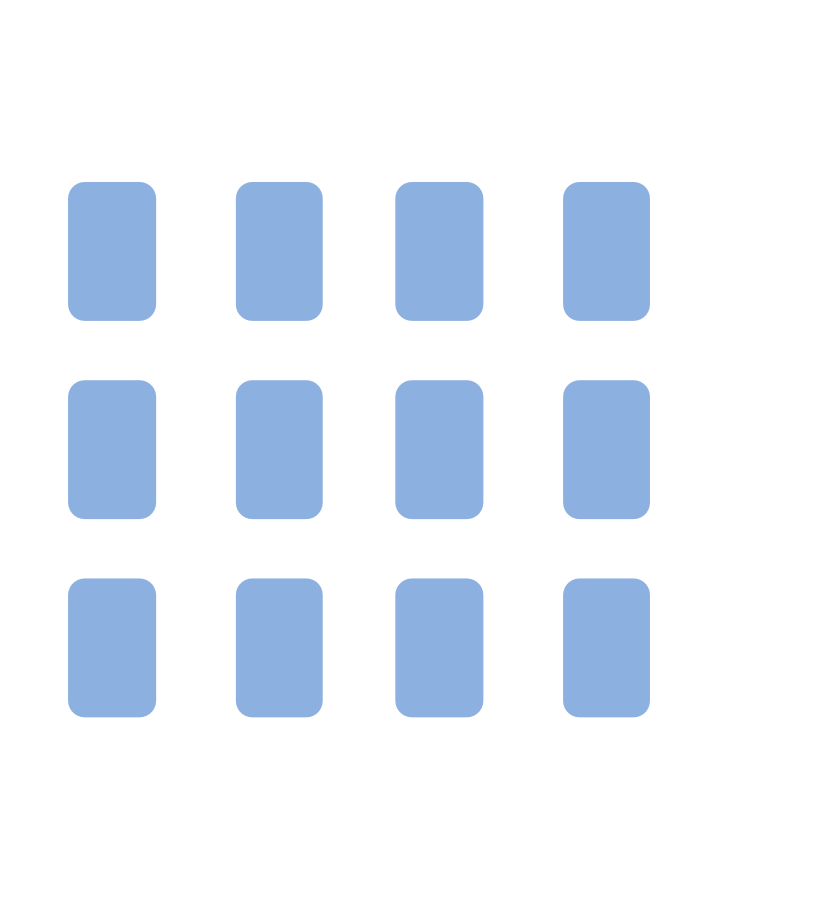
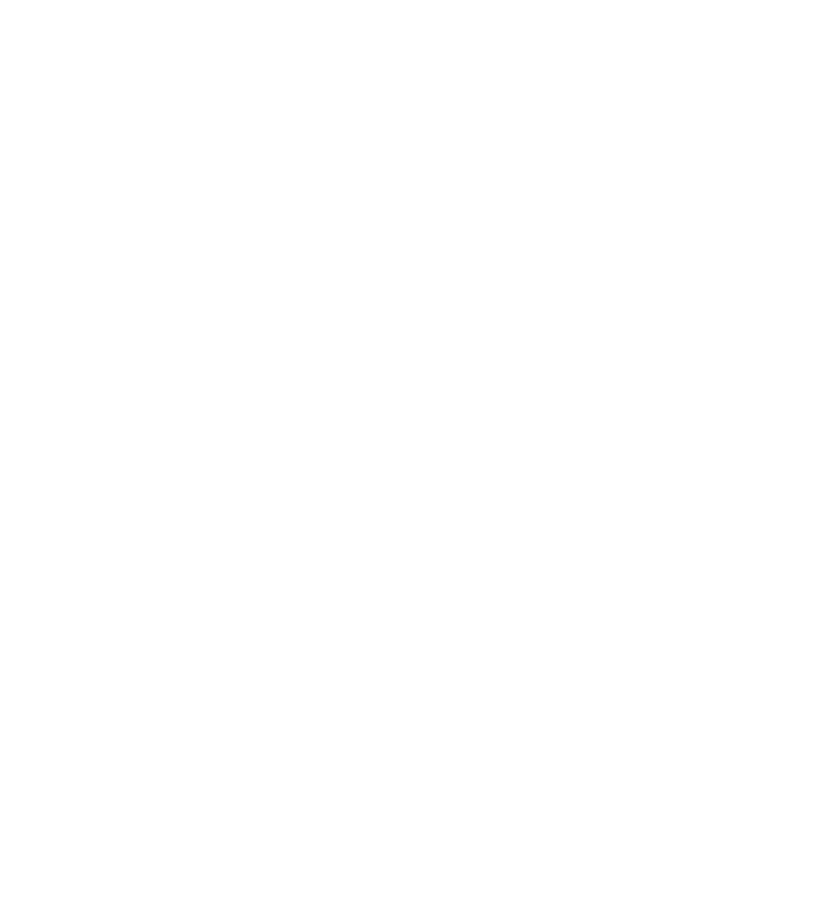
part: (195, 251) -> none
part: (522, 251) -> none
part: (195, 449) -> none
part: (522, 449) -> none
part: (195, 647) -> none
part: (522, 647) -> none

